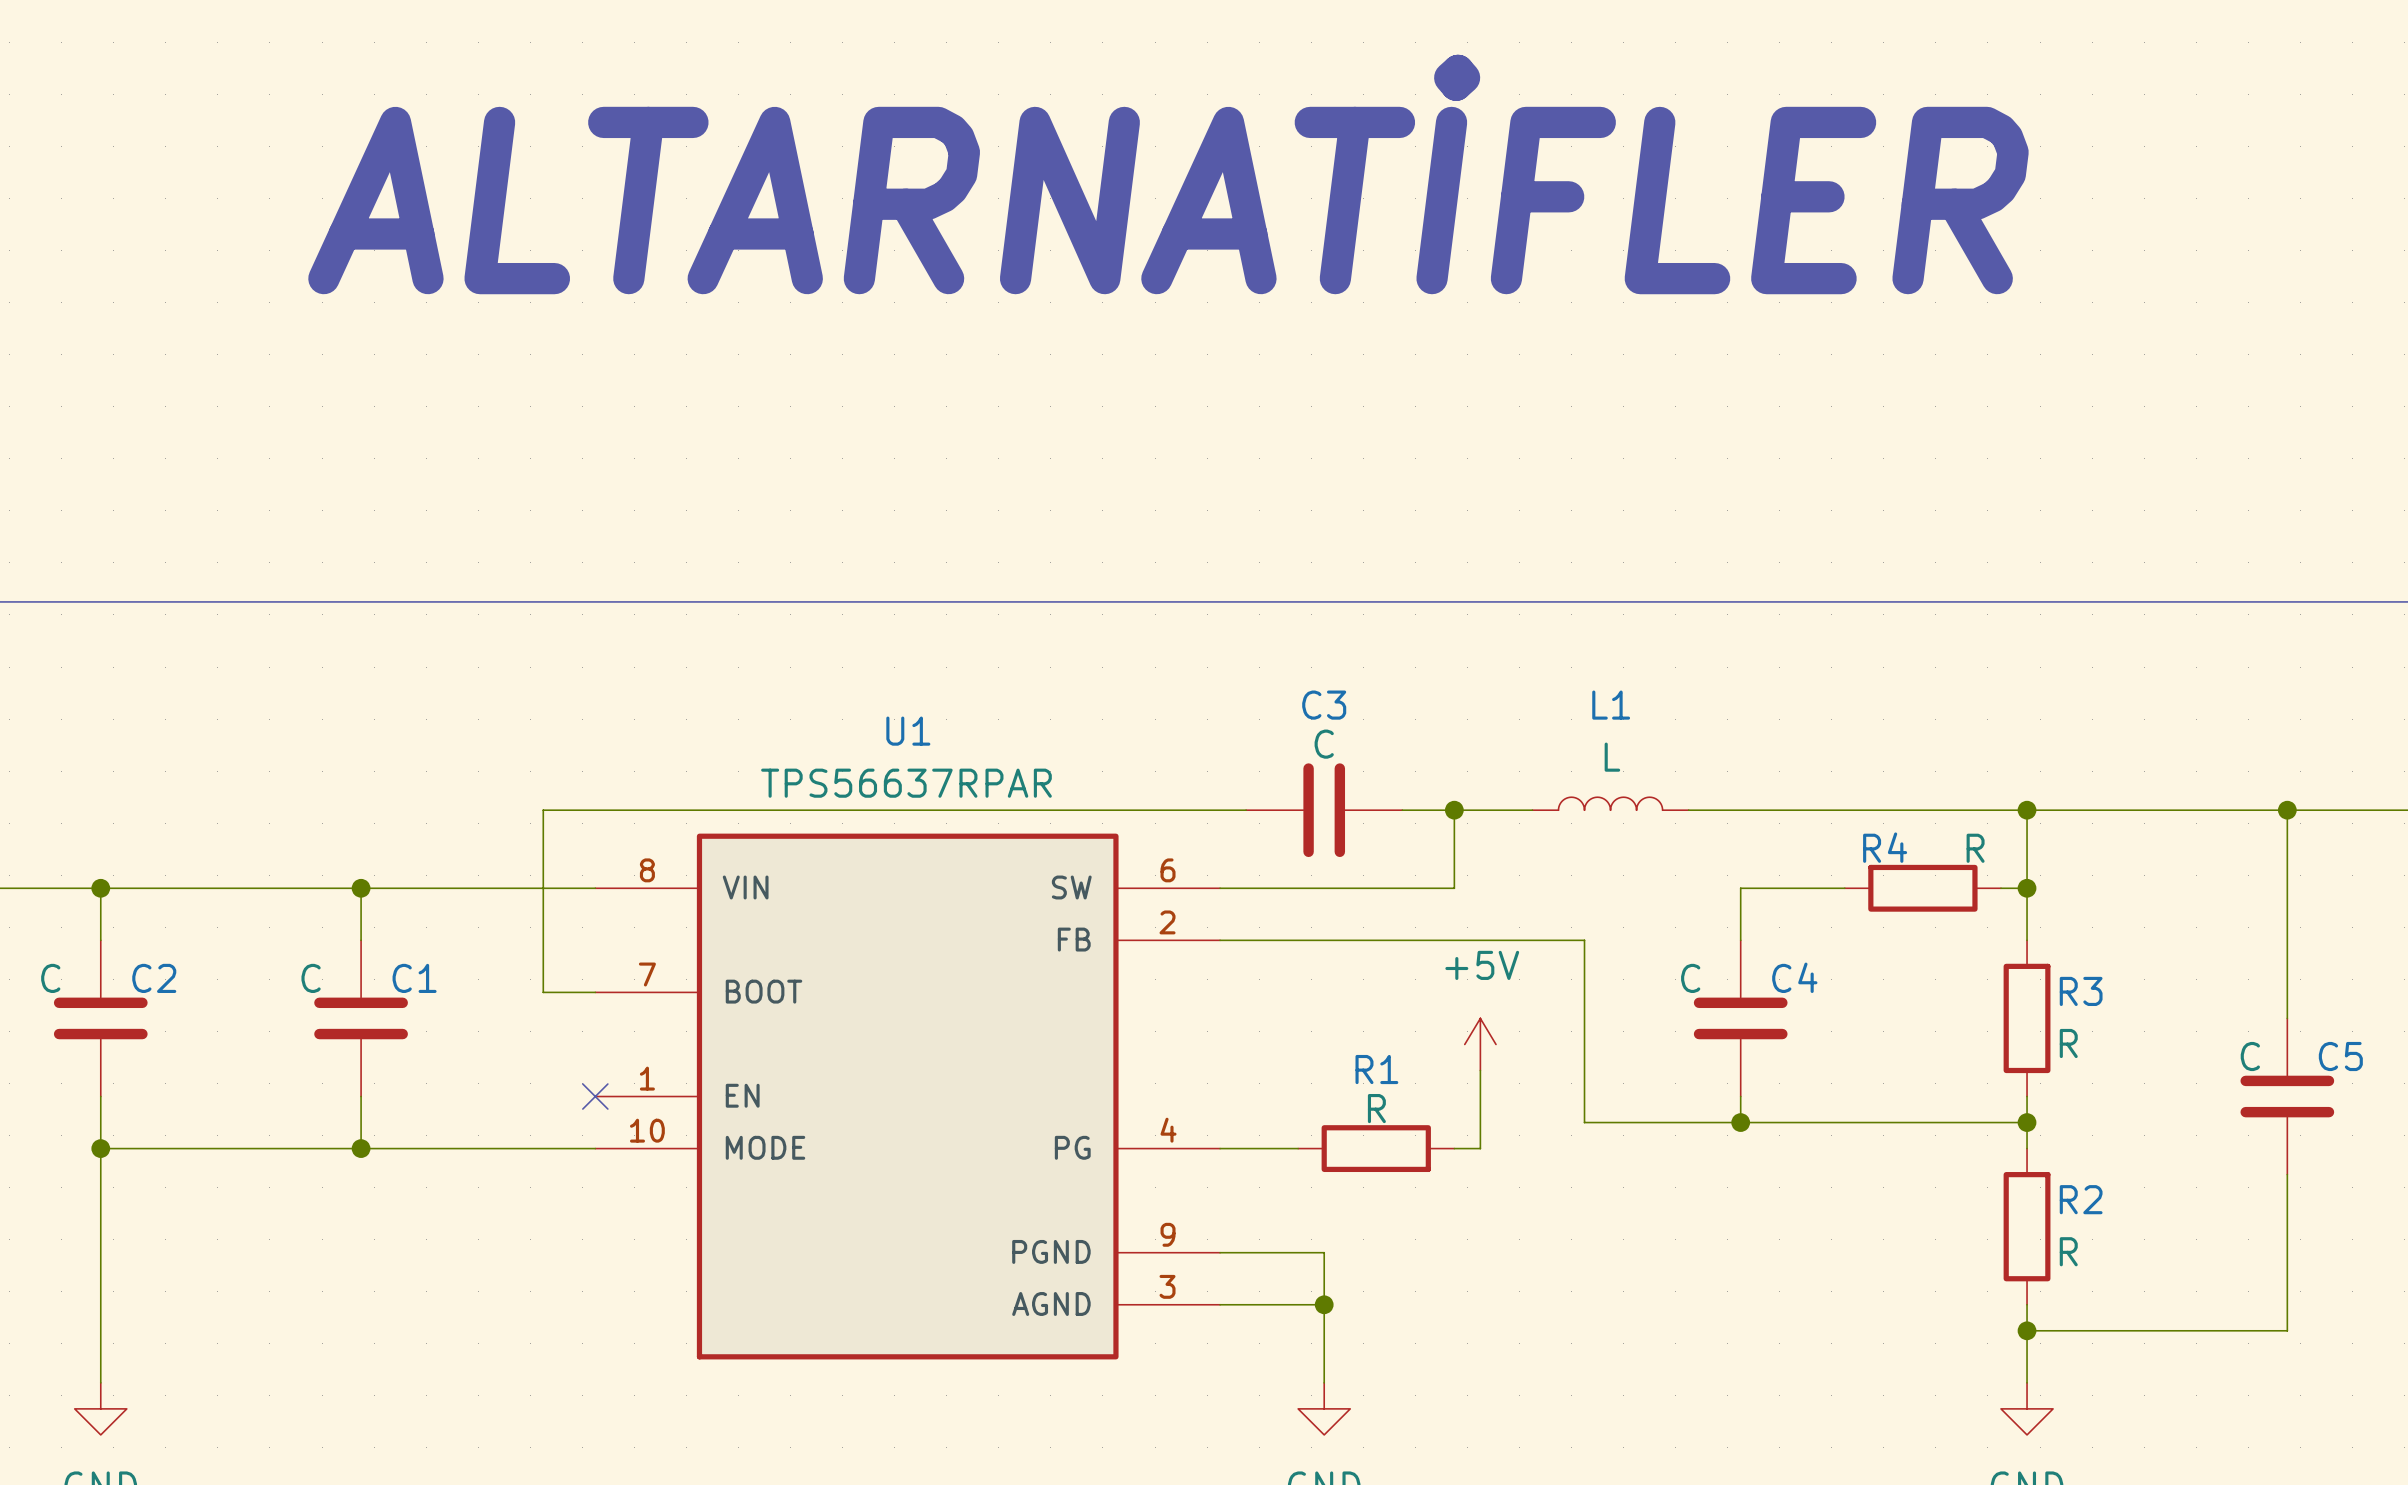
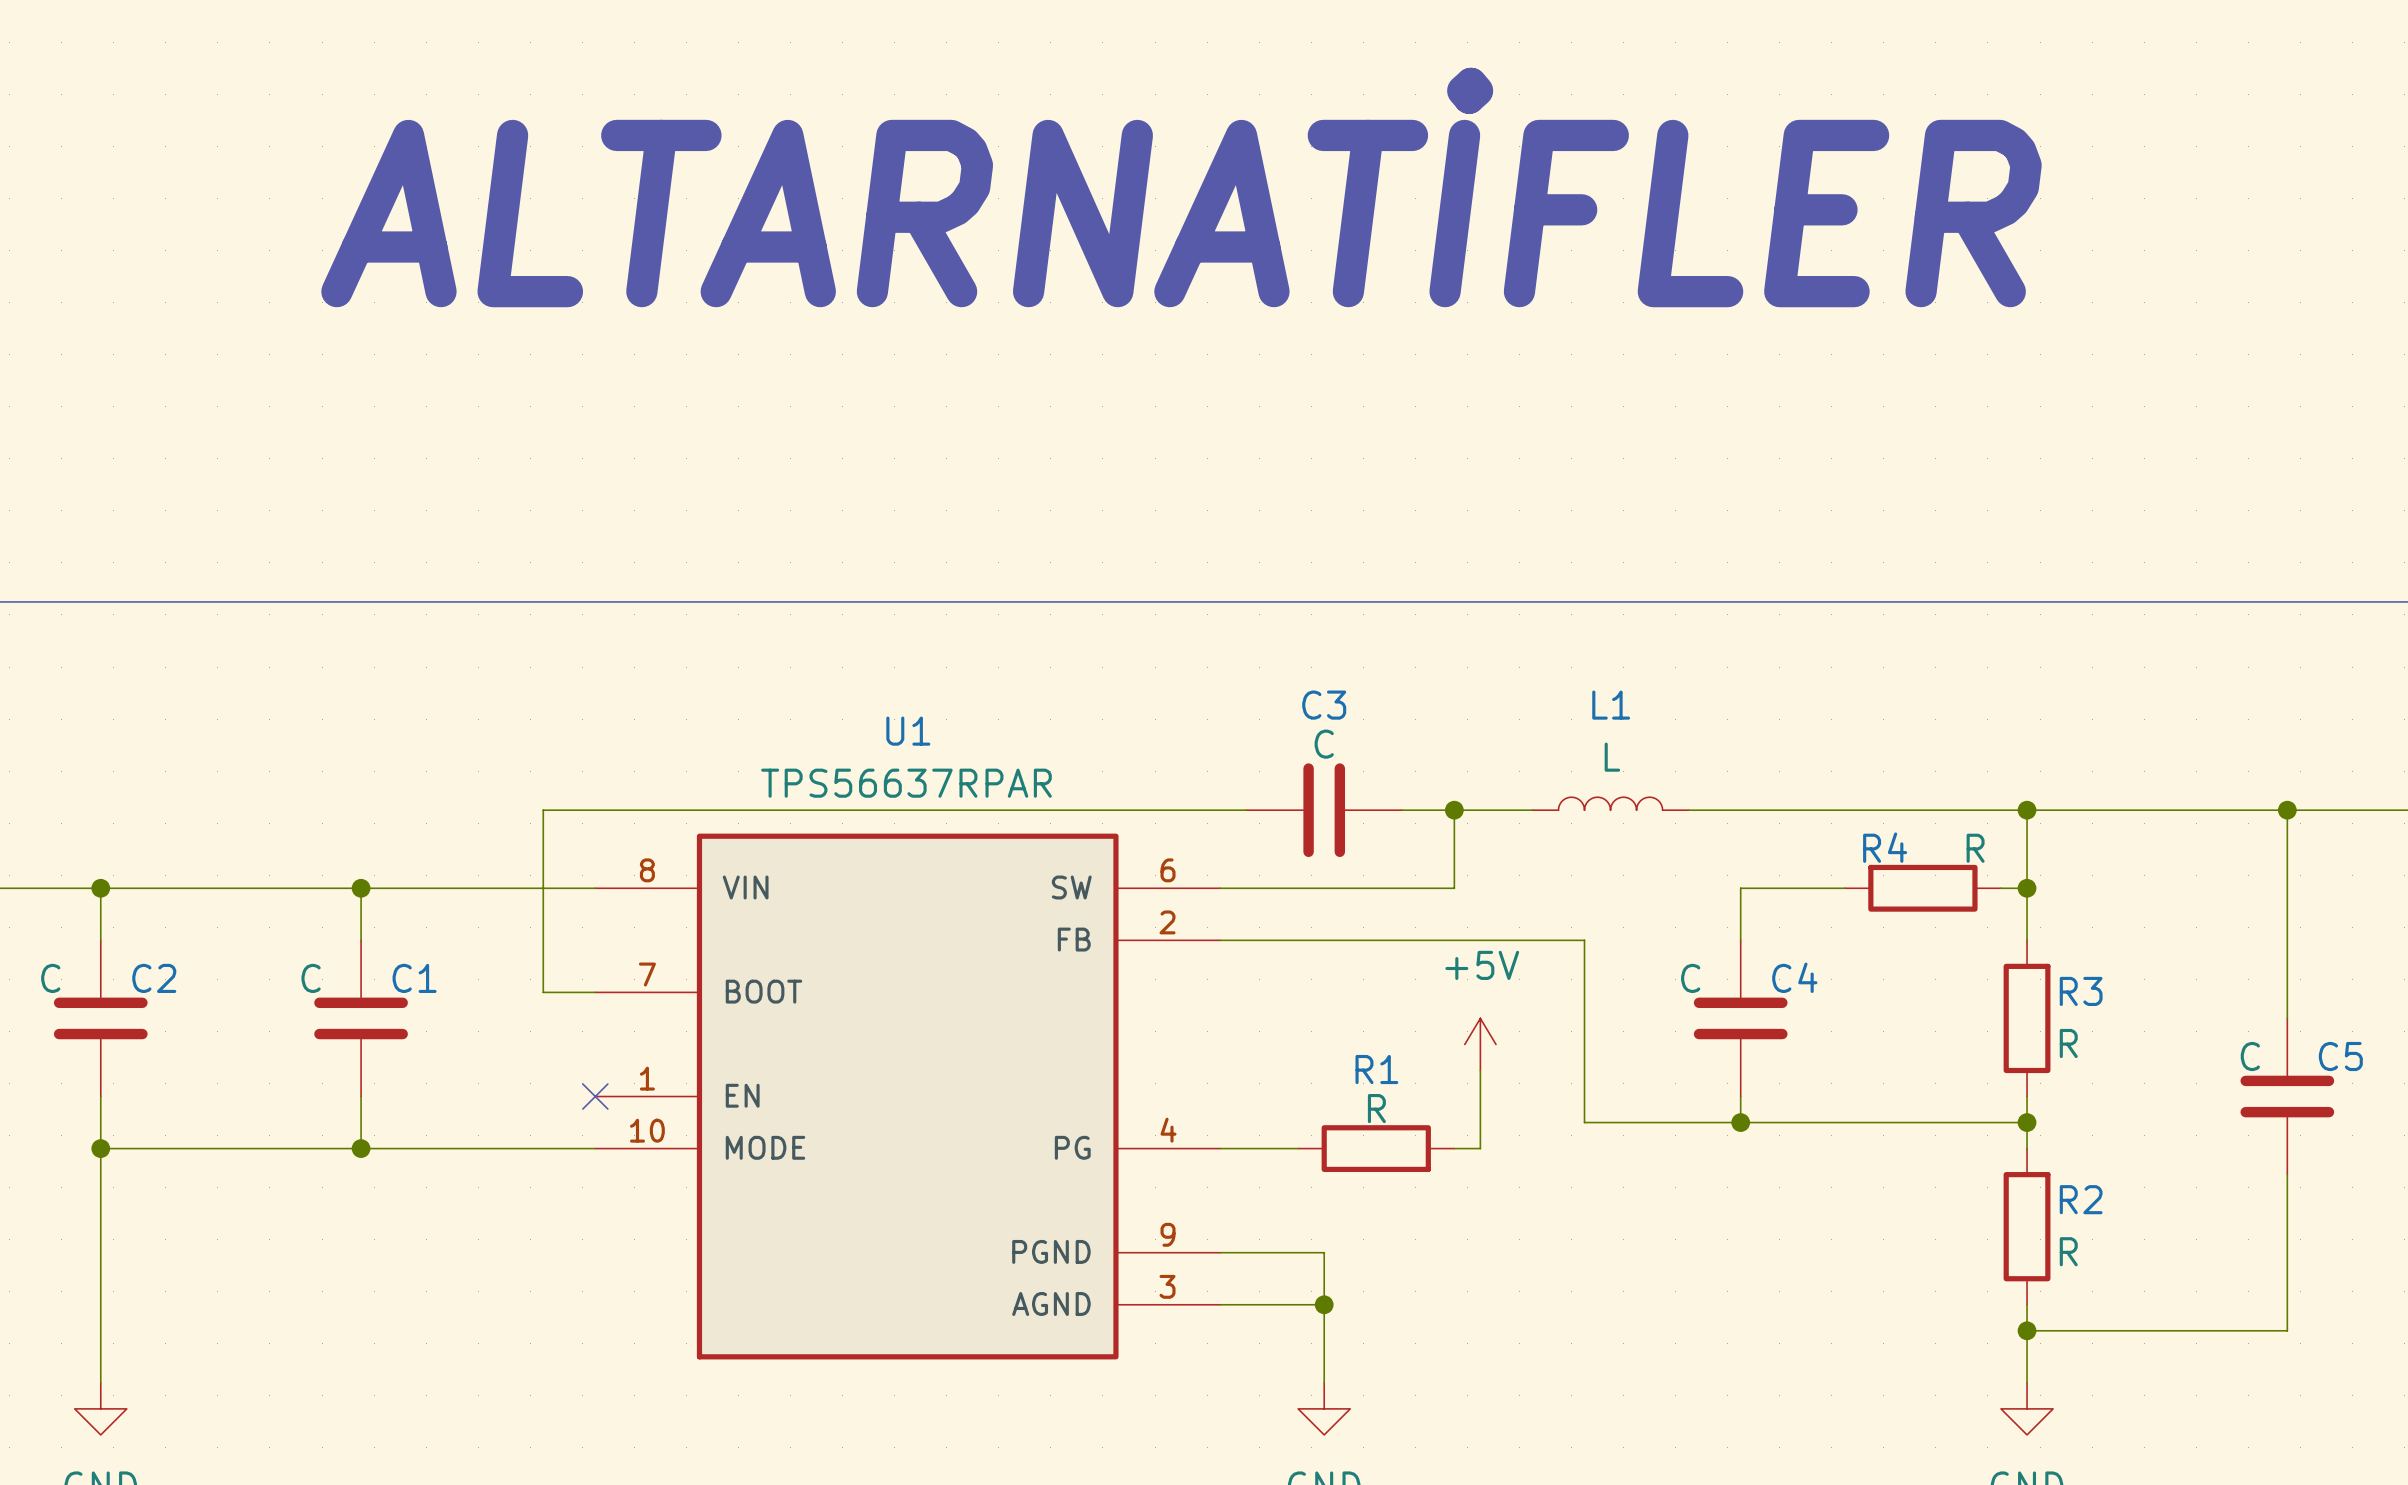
text position: ALTARNATİFLER (1168, 174) -> ALTARNATİFLER (1181, 187)

